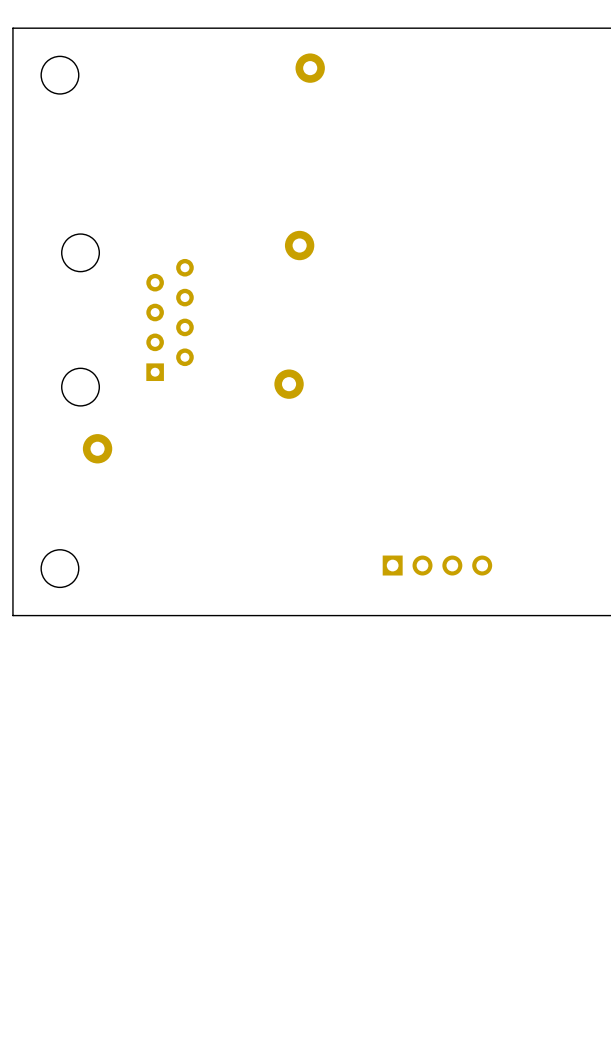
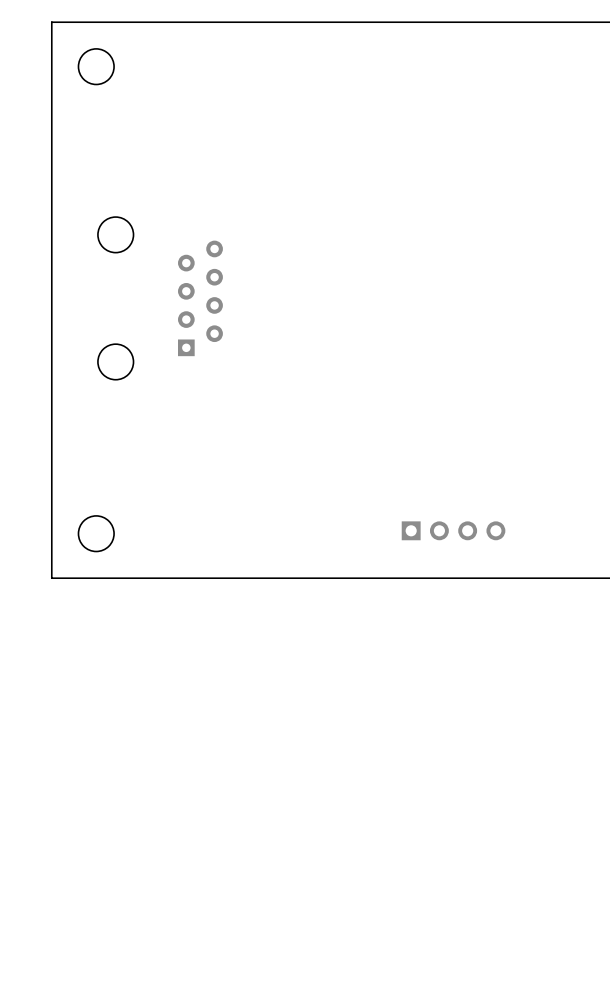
part: (310, 68) -> none
part: (299, 245) -> none
part: (289, 384) -> none
part: (97, 448) -> none

